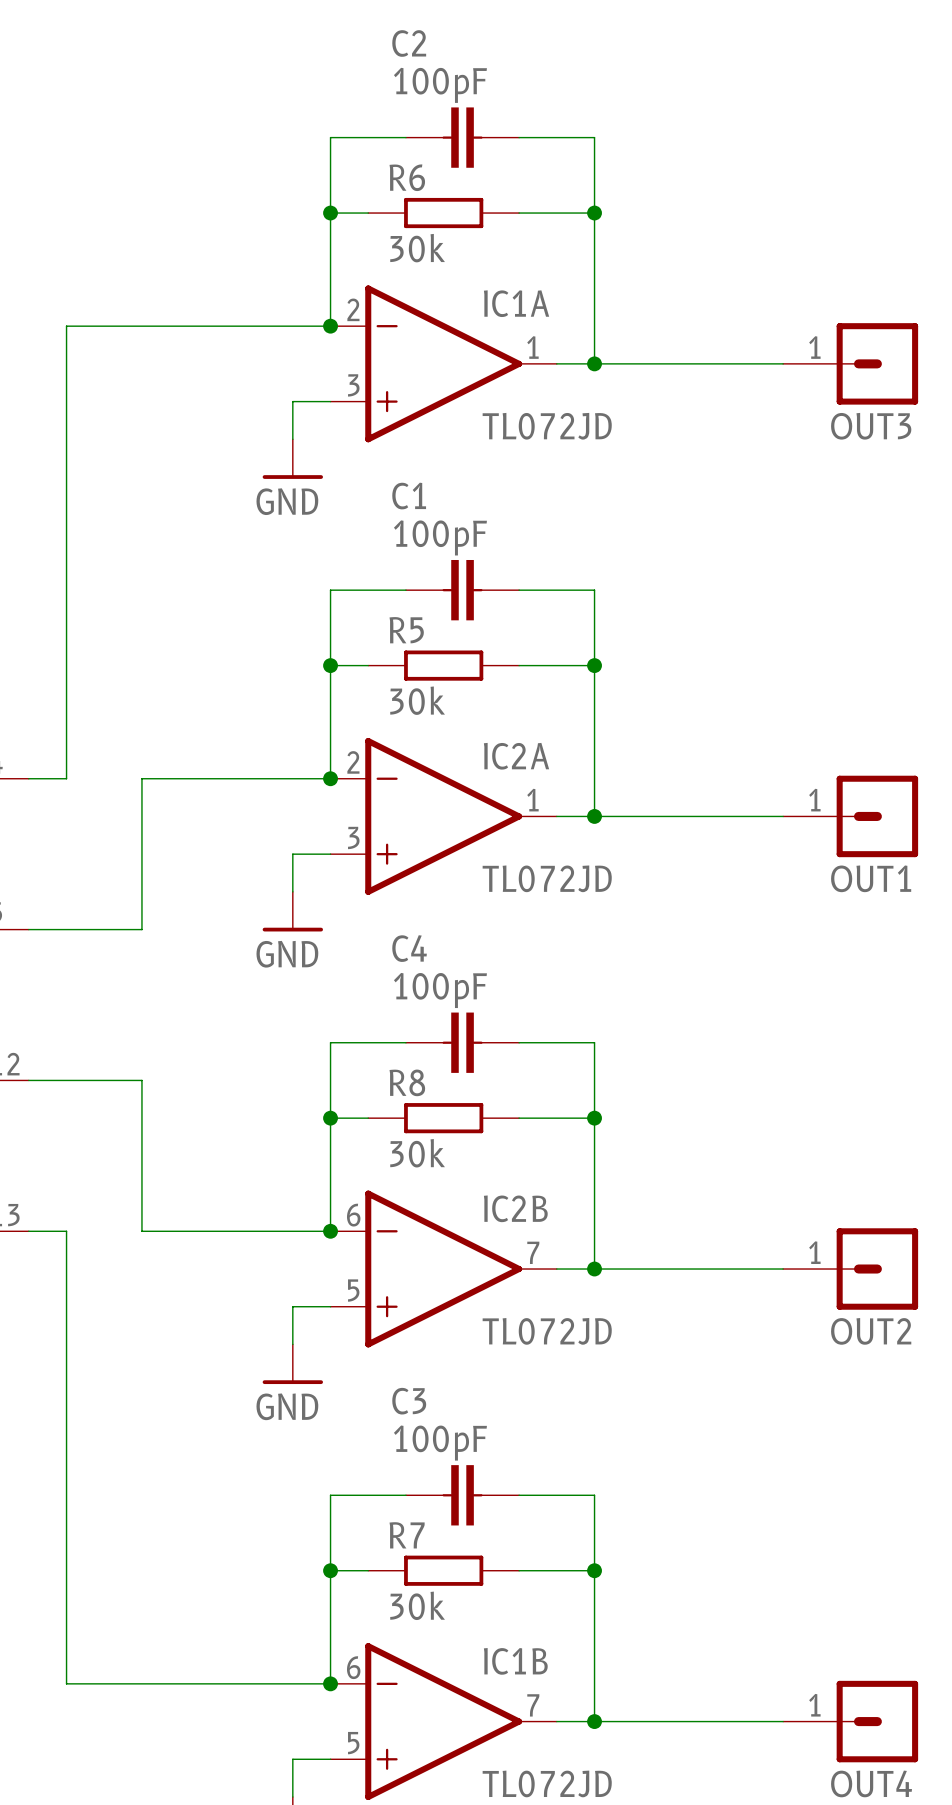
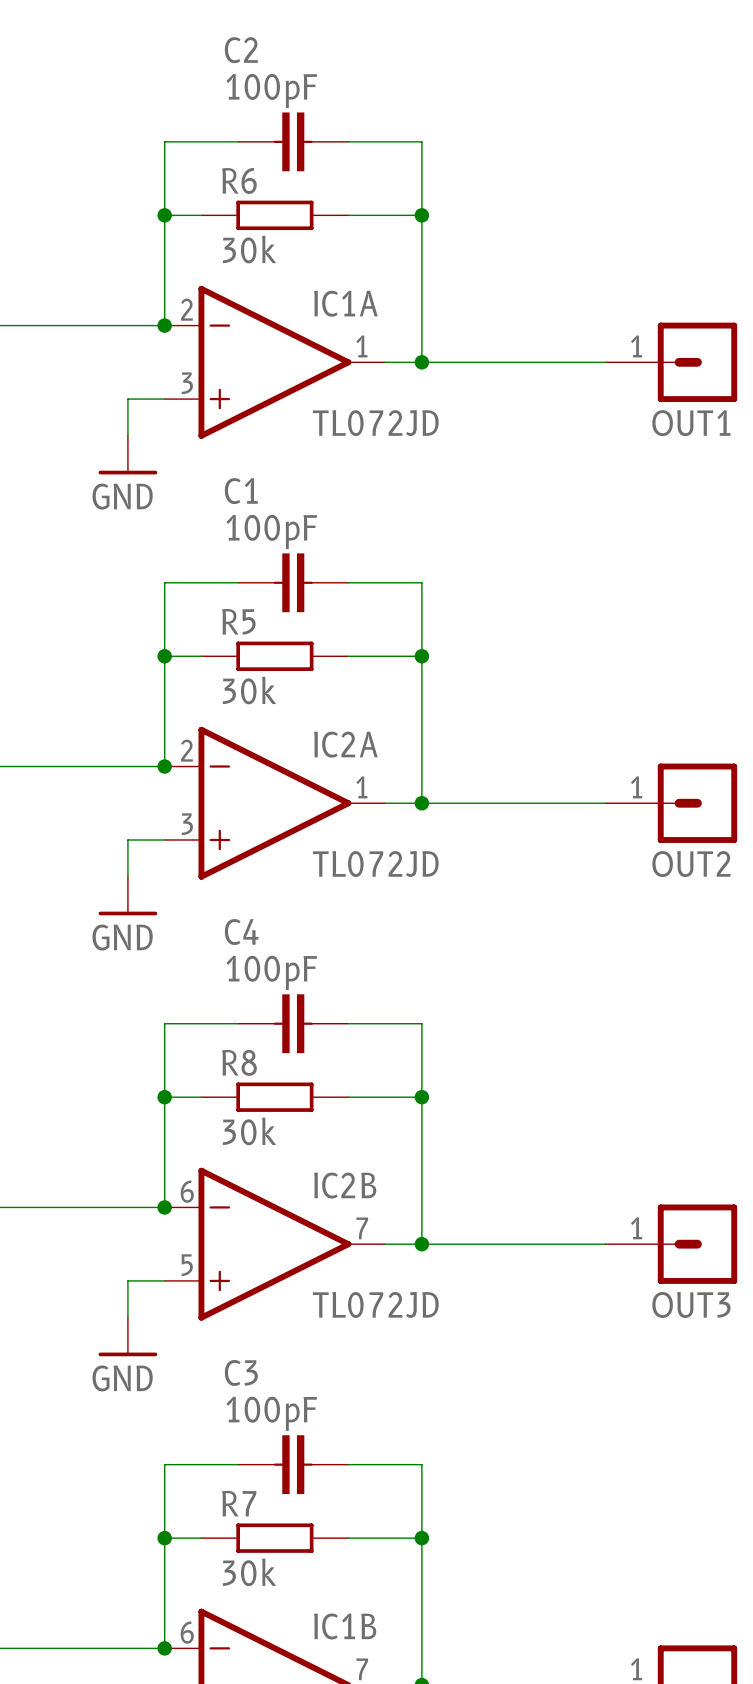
OUT3 name: OUT3 (871, 426) -> OUT1 (691, 423)
OUT1 name: OUT1 (871, 878) -> OUT2 (691, 864)
OUT2 name: OUT2 (871, 1331) -> OUT3 (691, 1304)

